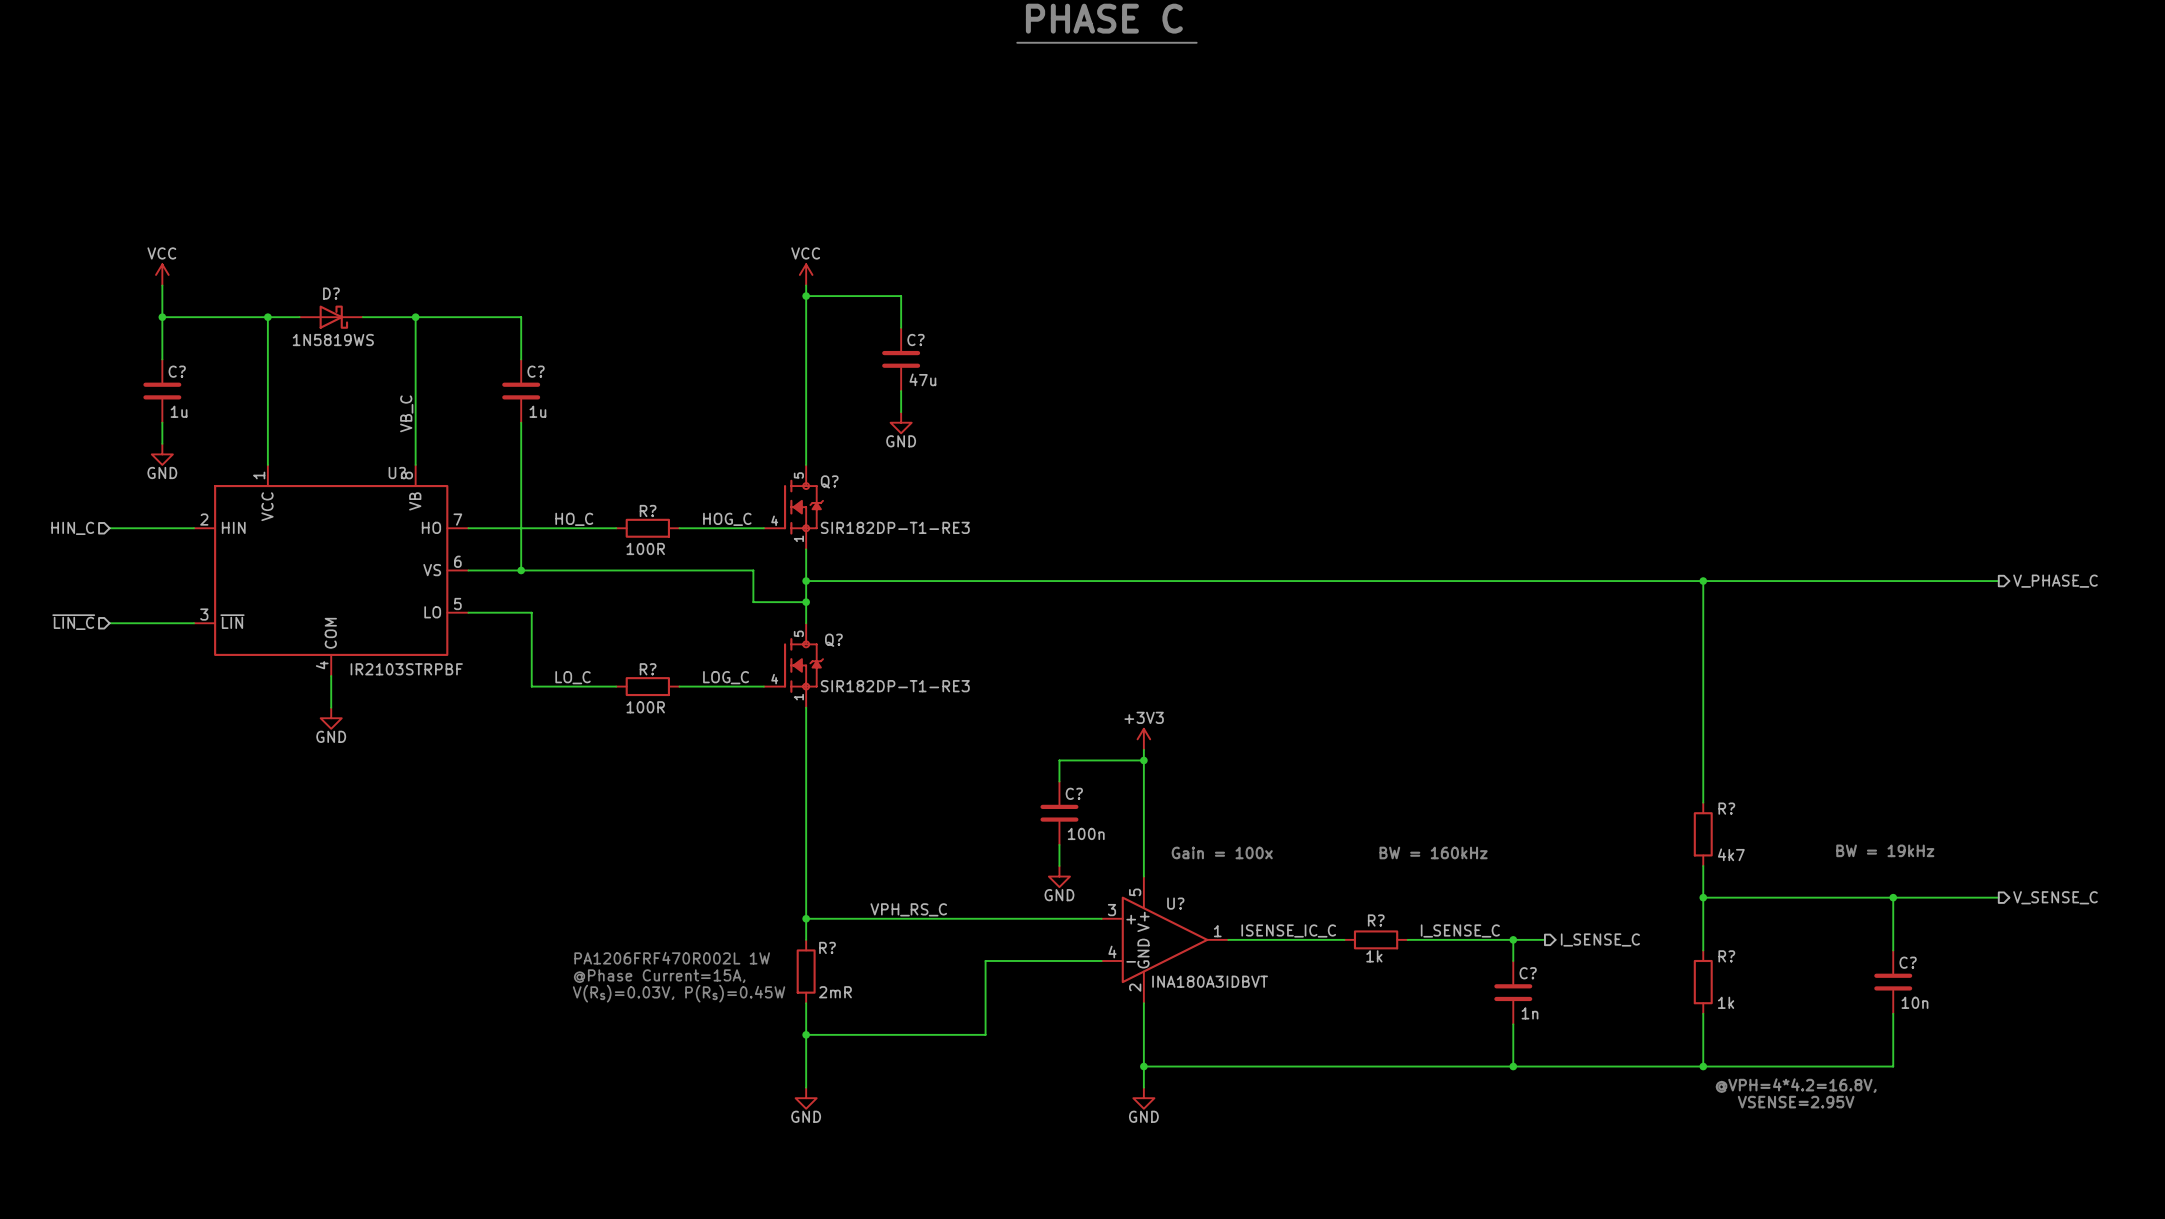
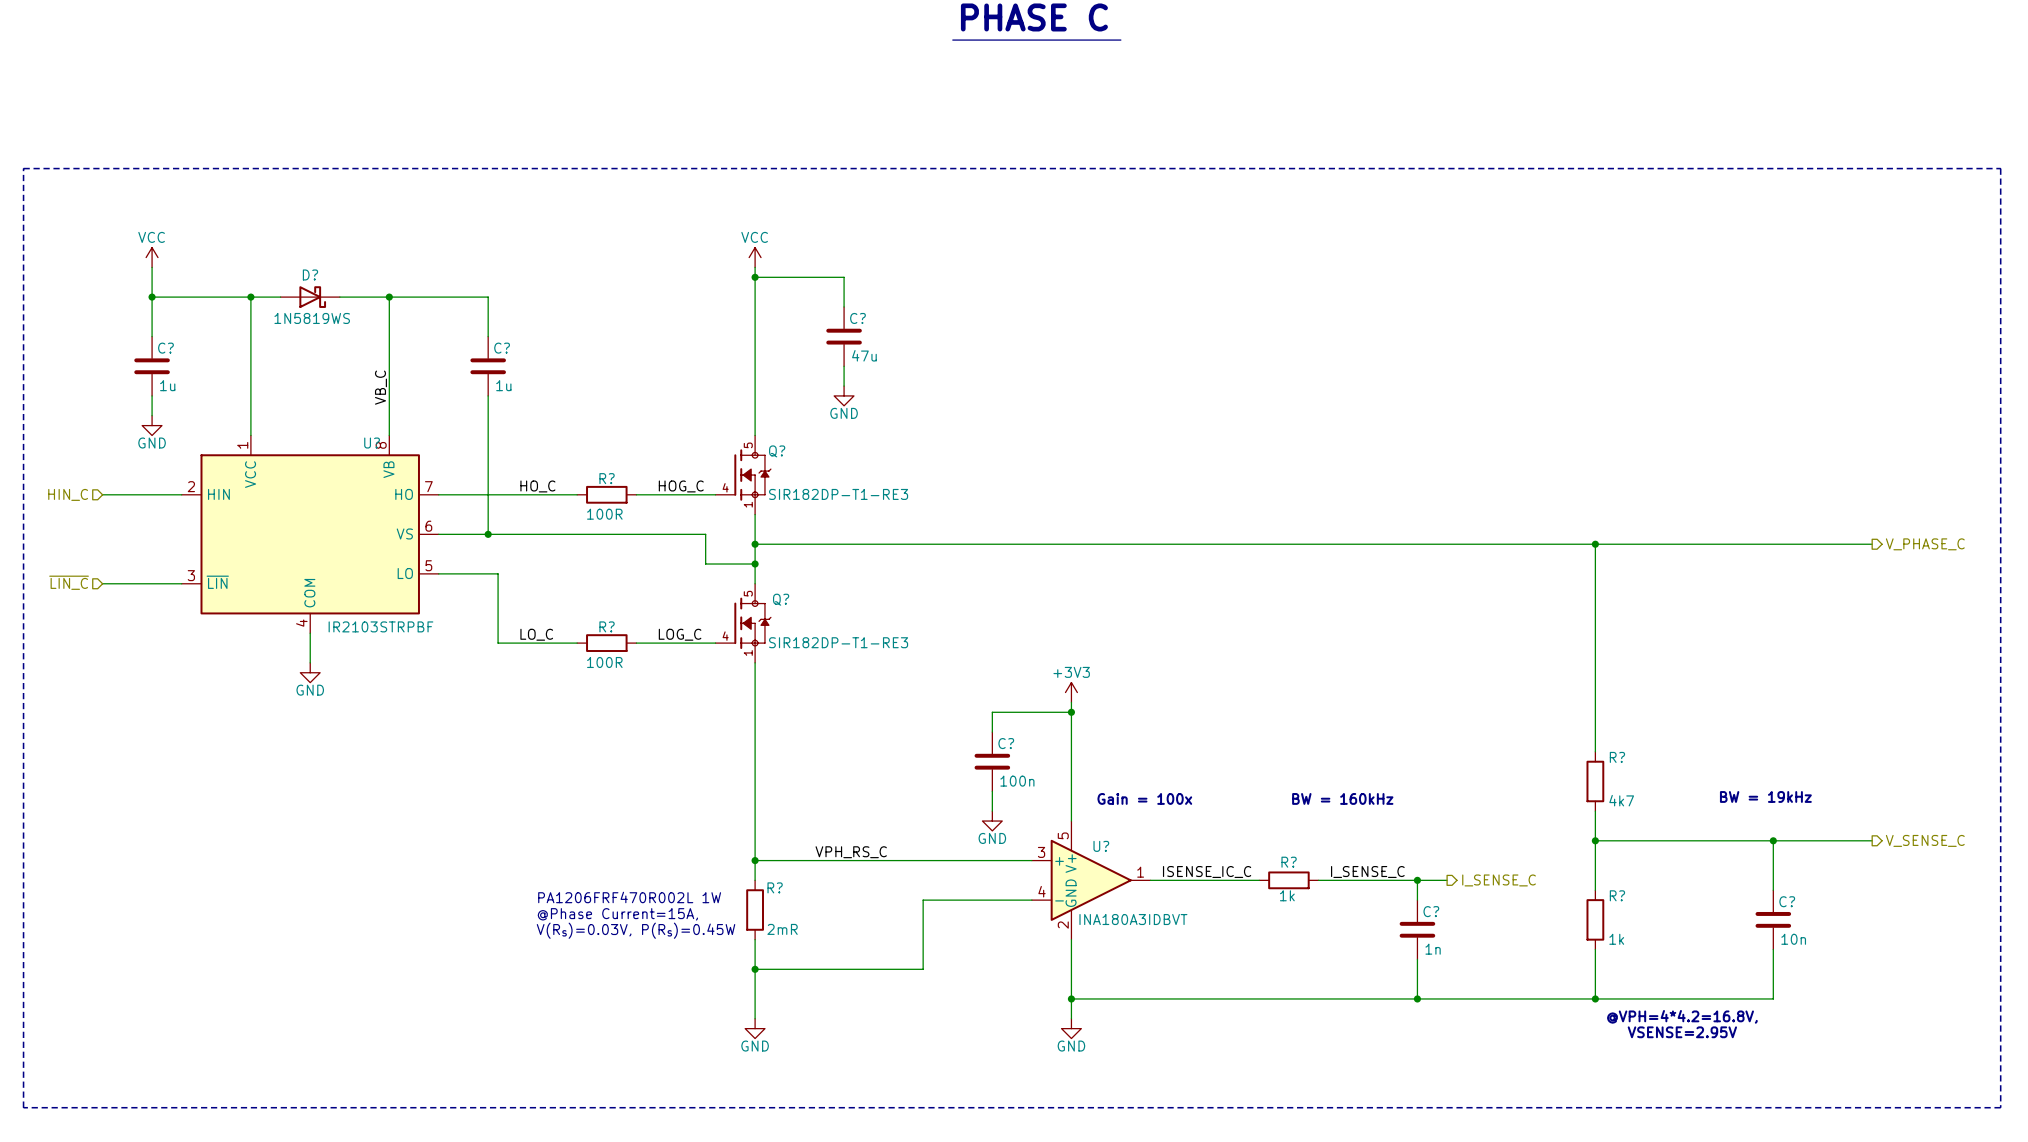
line: none -> (23, 168) (2000, 168) (2000, 1107) (23, 1107) (23, 168)

